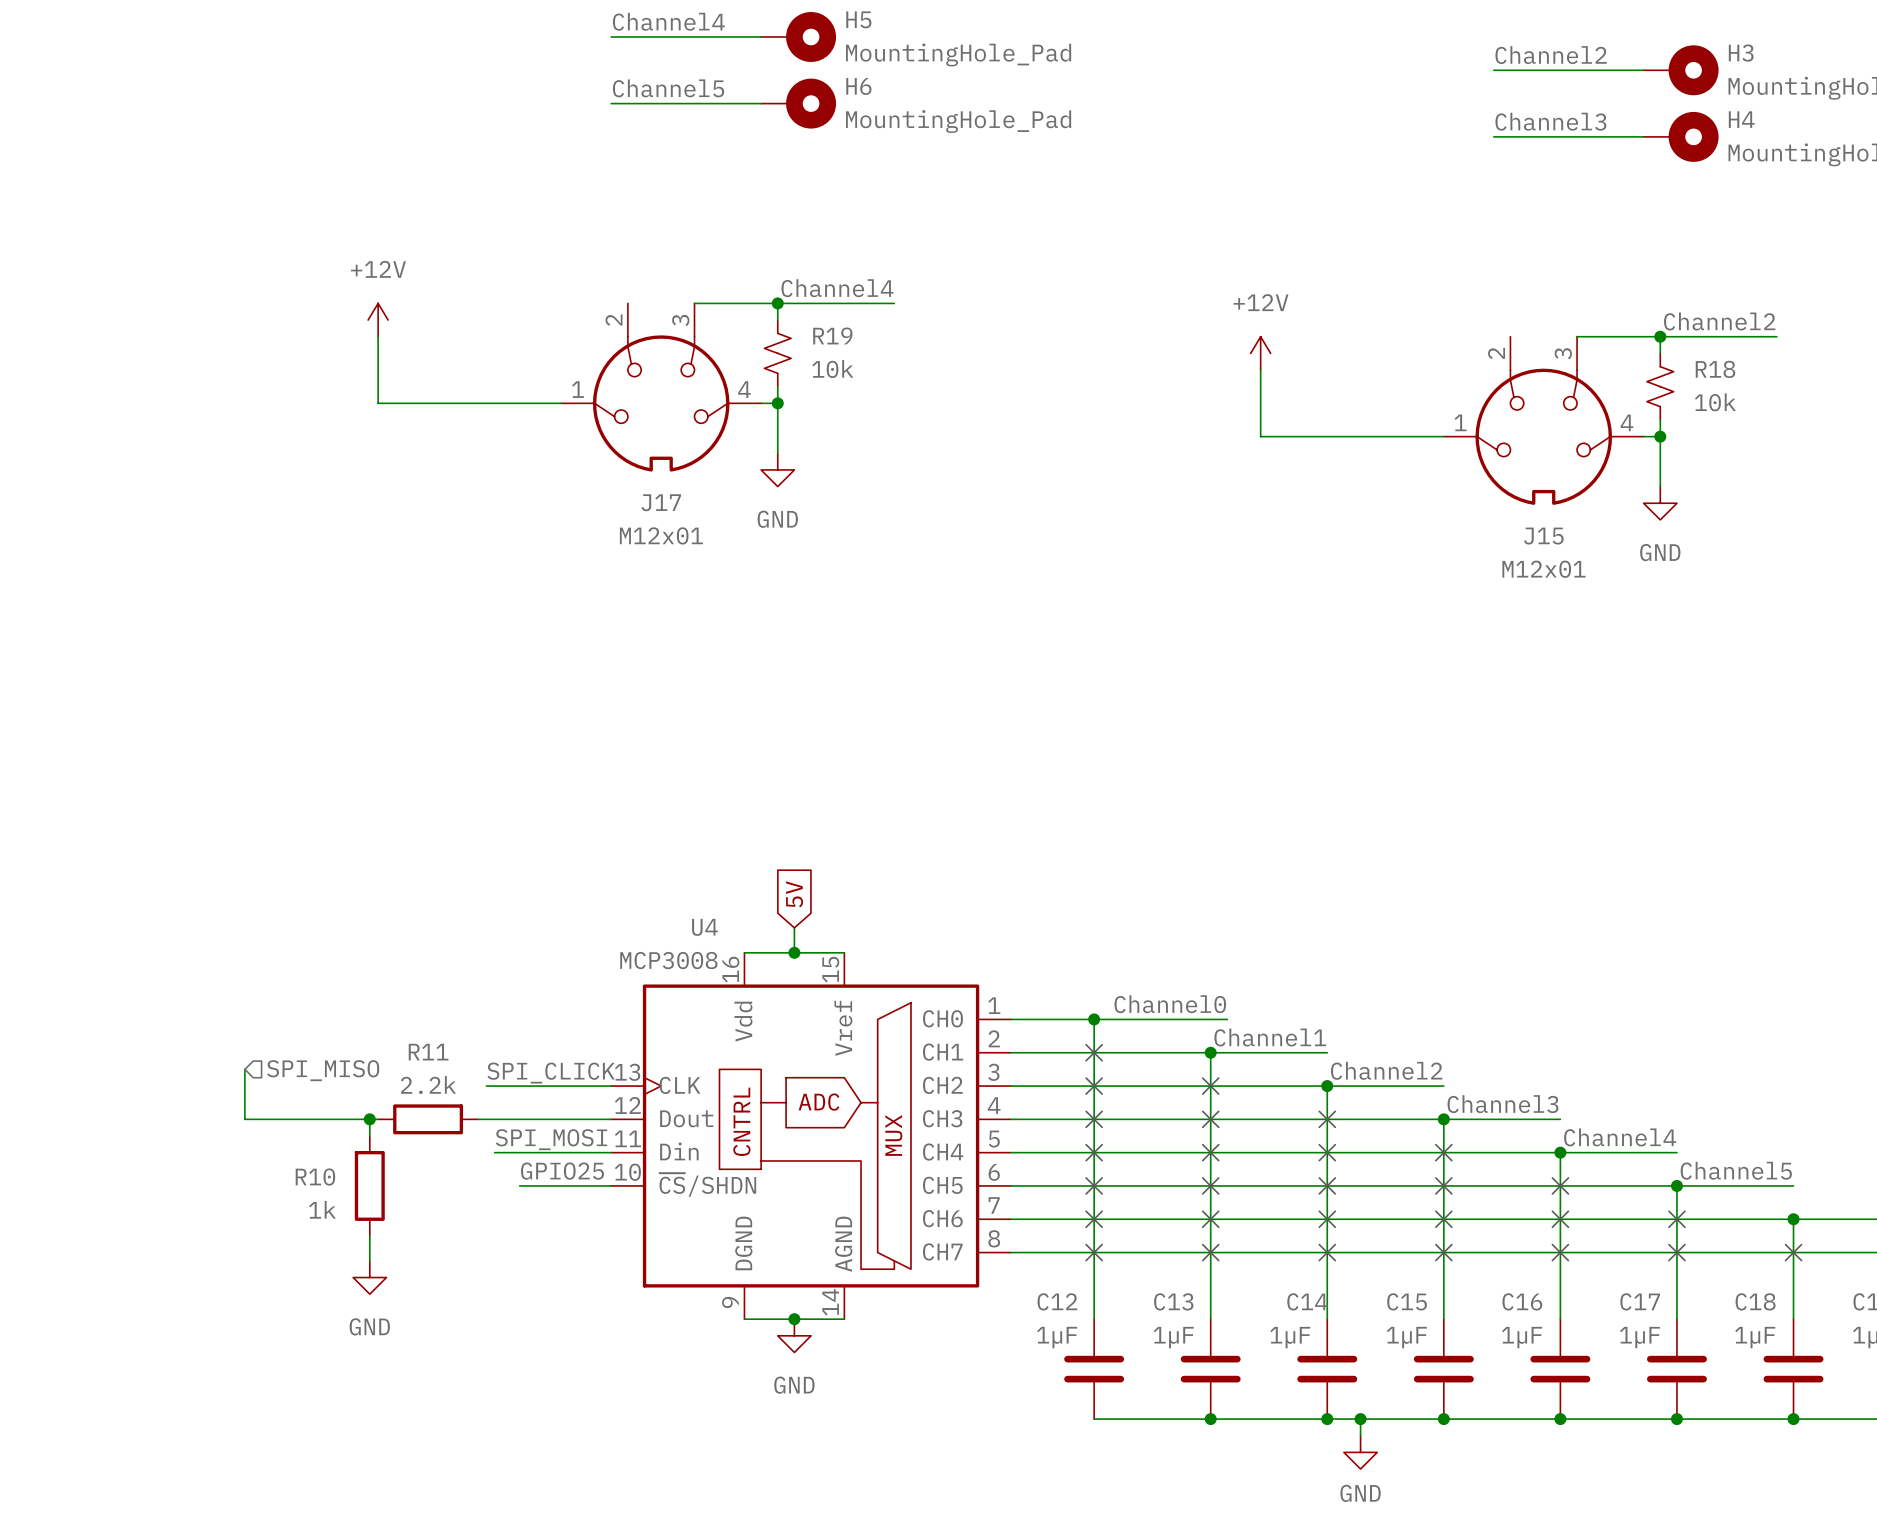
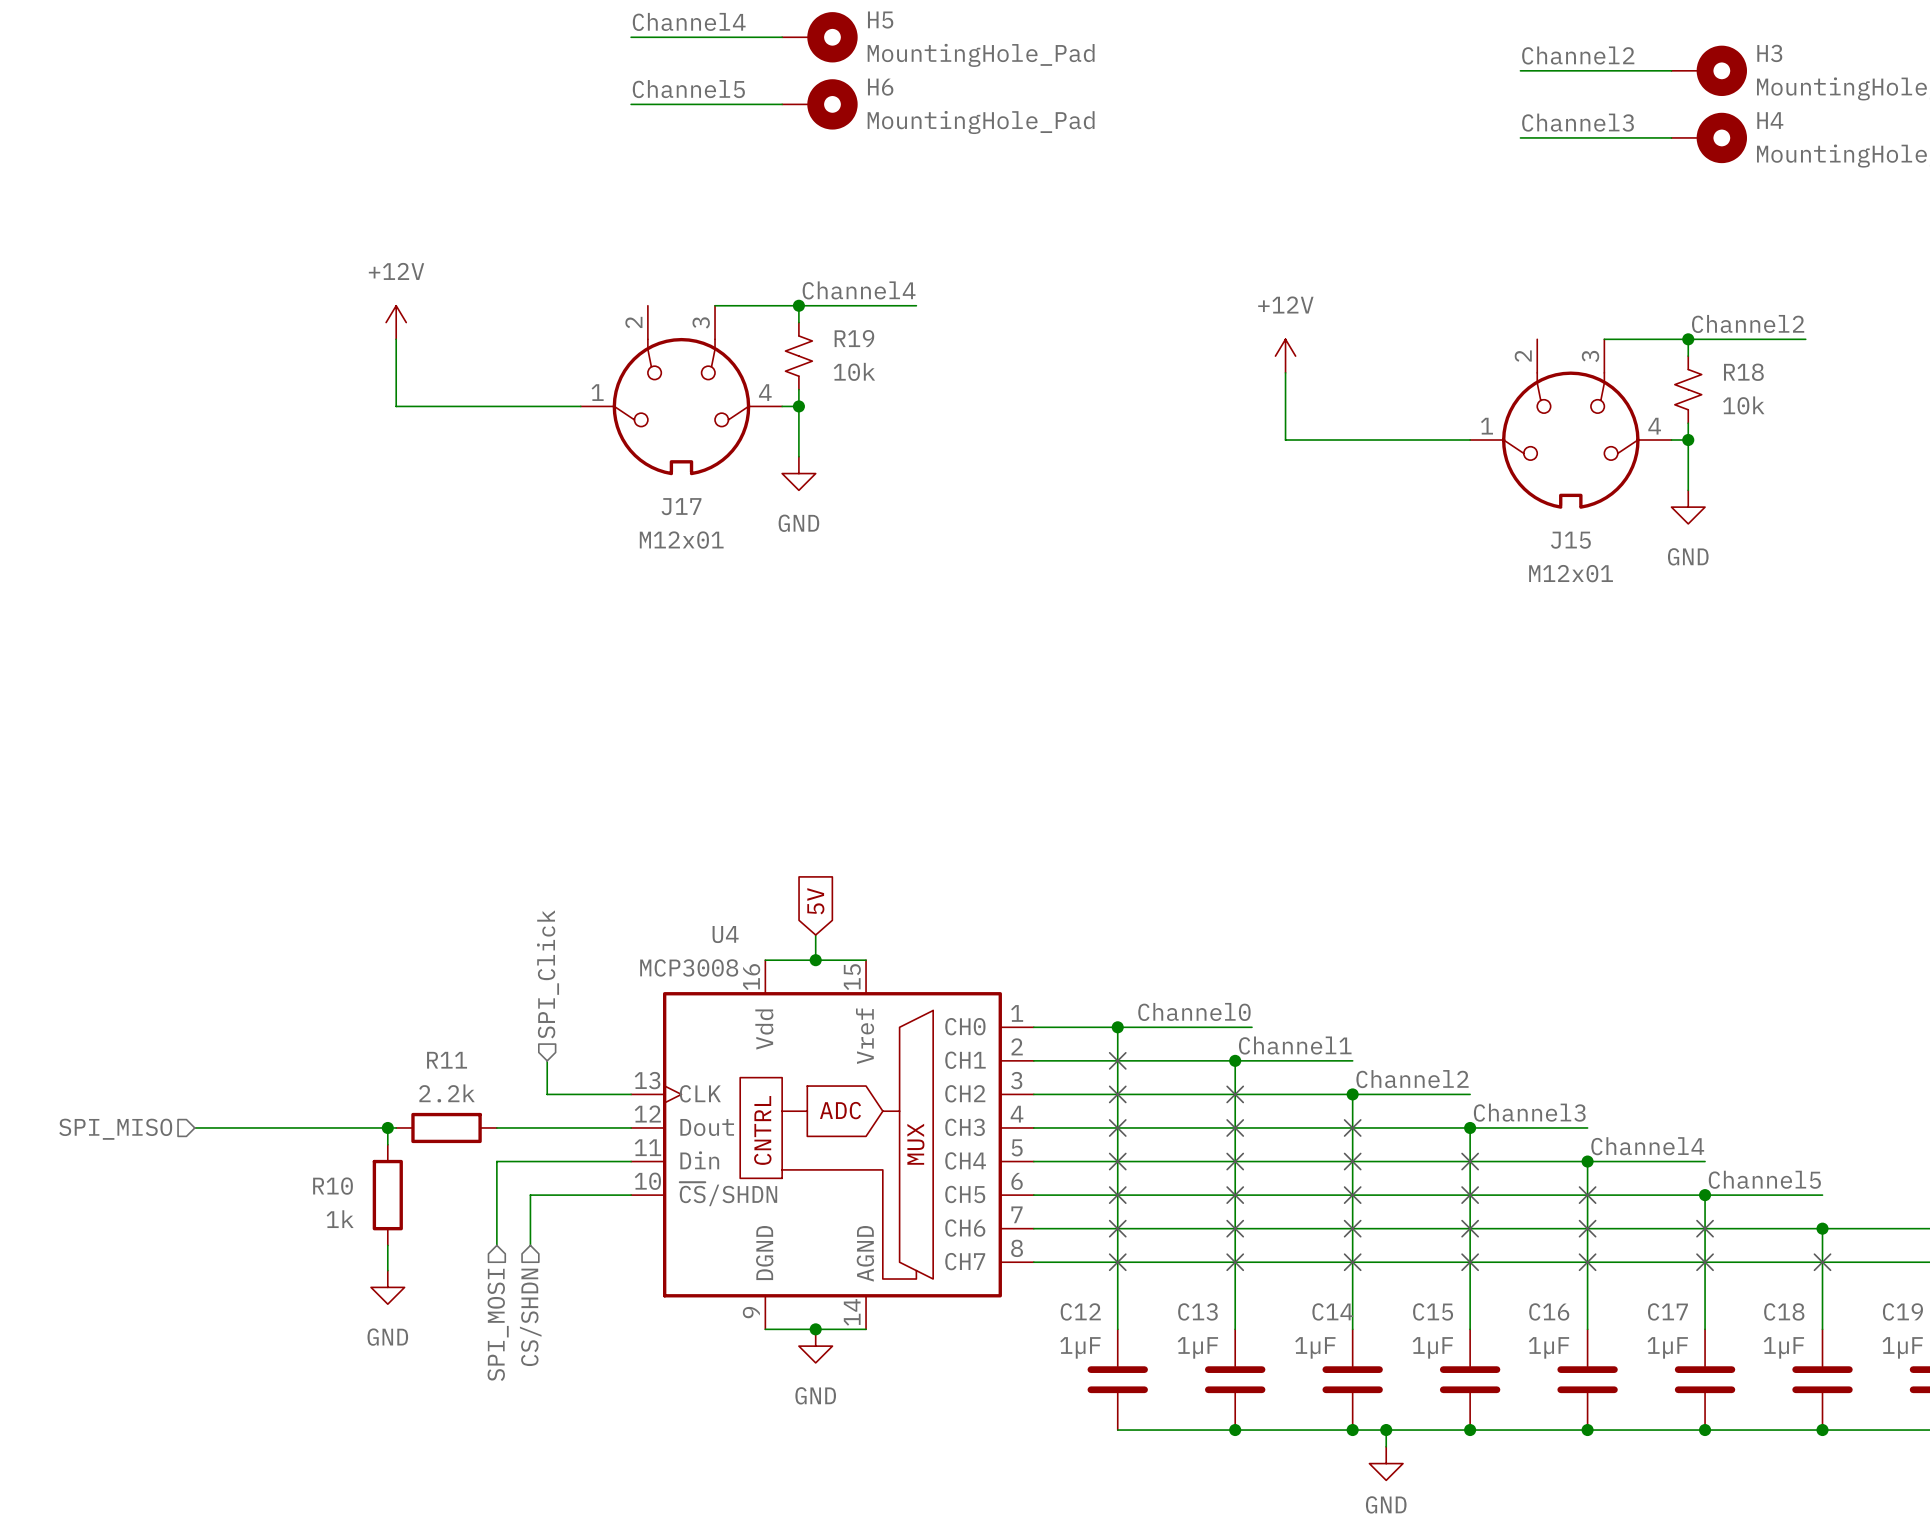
hierarchical label: none -> SPI_Click (548, 974)
wire: (244, 1069) (244, 1119) -> (194, 1127) (261, 1127)
hierarchical label rotation: 0° (323, 1070) -> 180° (115, 1129)
hierarchical label position: SPI_MISO (323, 1070) -> SPI_MISO (115, 1129)
label: SPI_CLICK (551, 1073) -> none
wire: (486, 1086) (527, 1086) -> (547, 1060) (547, 1094)
label: SPI_MOSI (551, 1139) -> none
wire: none -> (513, 1161) (496, 1161) (496, 1245)
label: GPIO25 (562, 1171) -> none
wire: none -> (538, 1195) (530, 1195) (530, 1245)
hierarchical label: none -> CS/SHDN (530, 1317)
hierarchical label: none -> SPI_MOSI (498, 1324)

